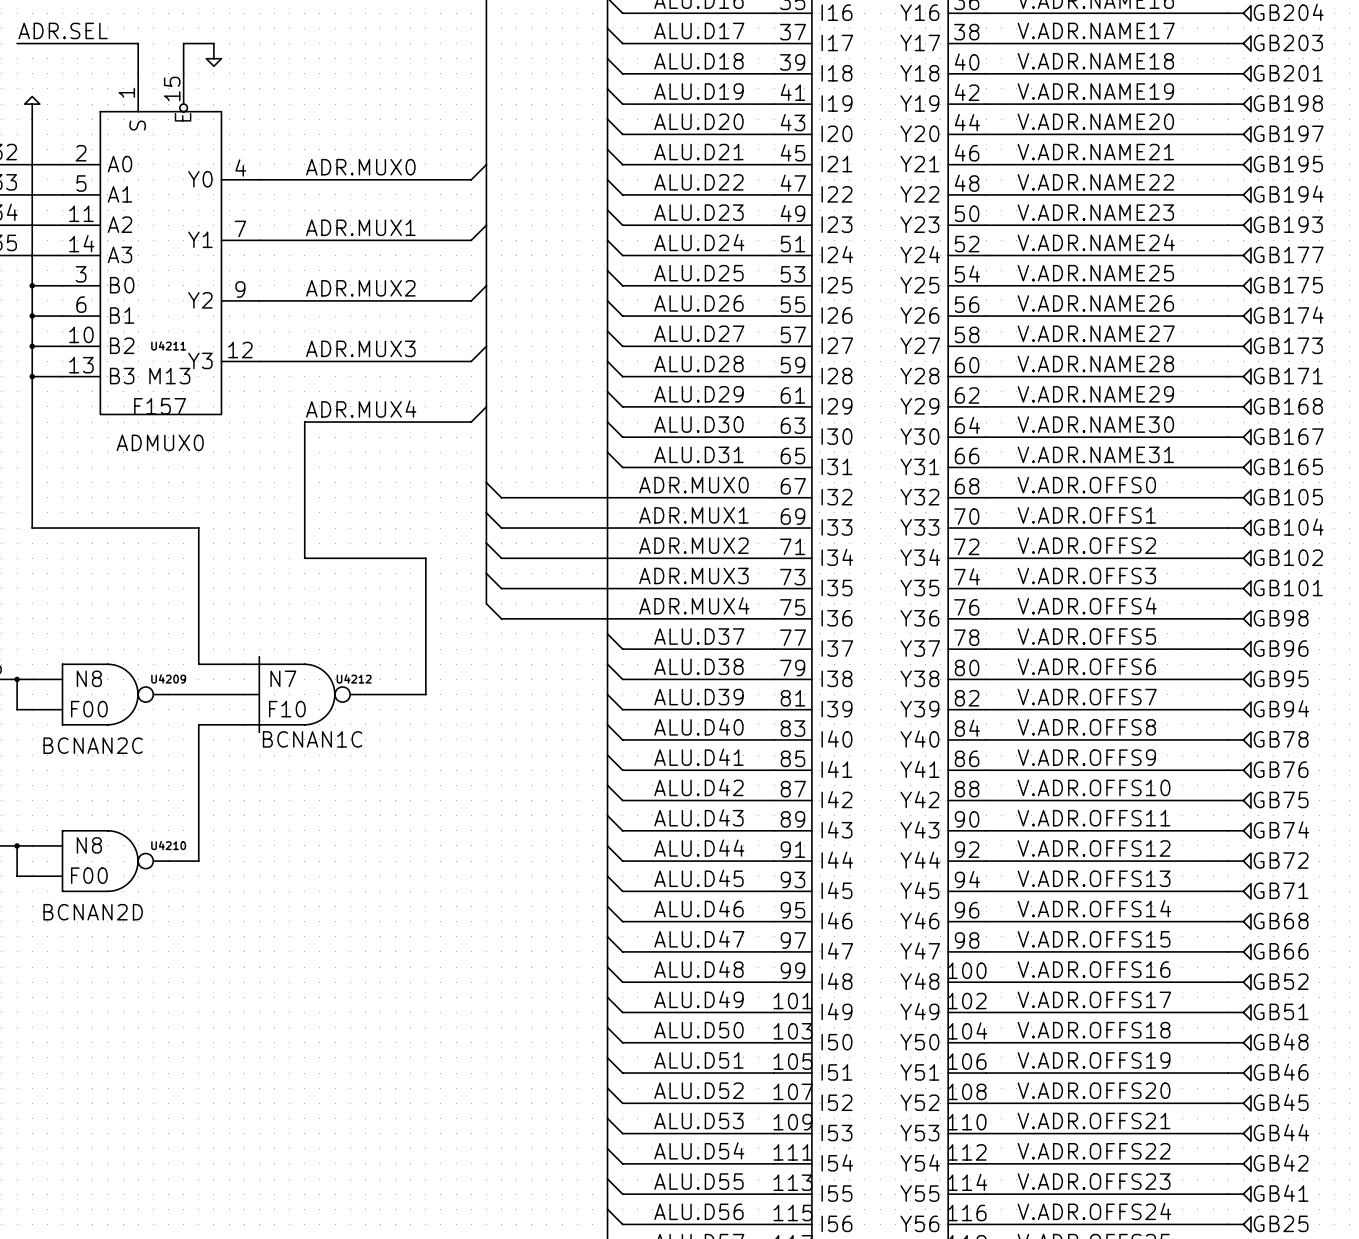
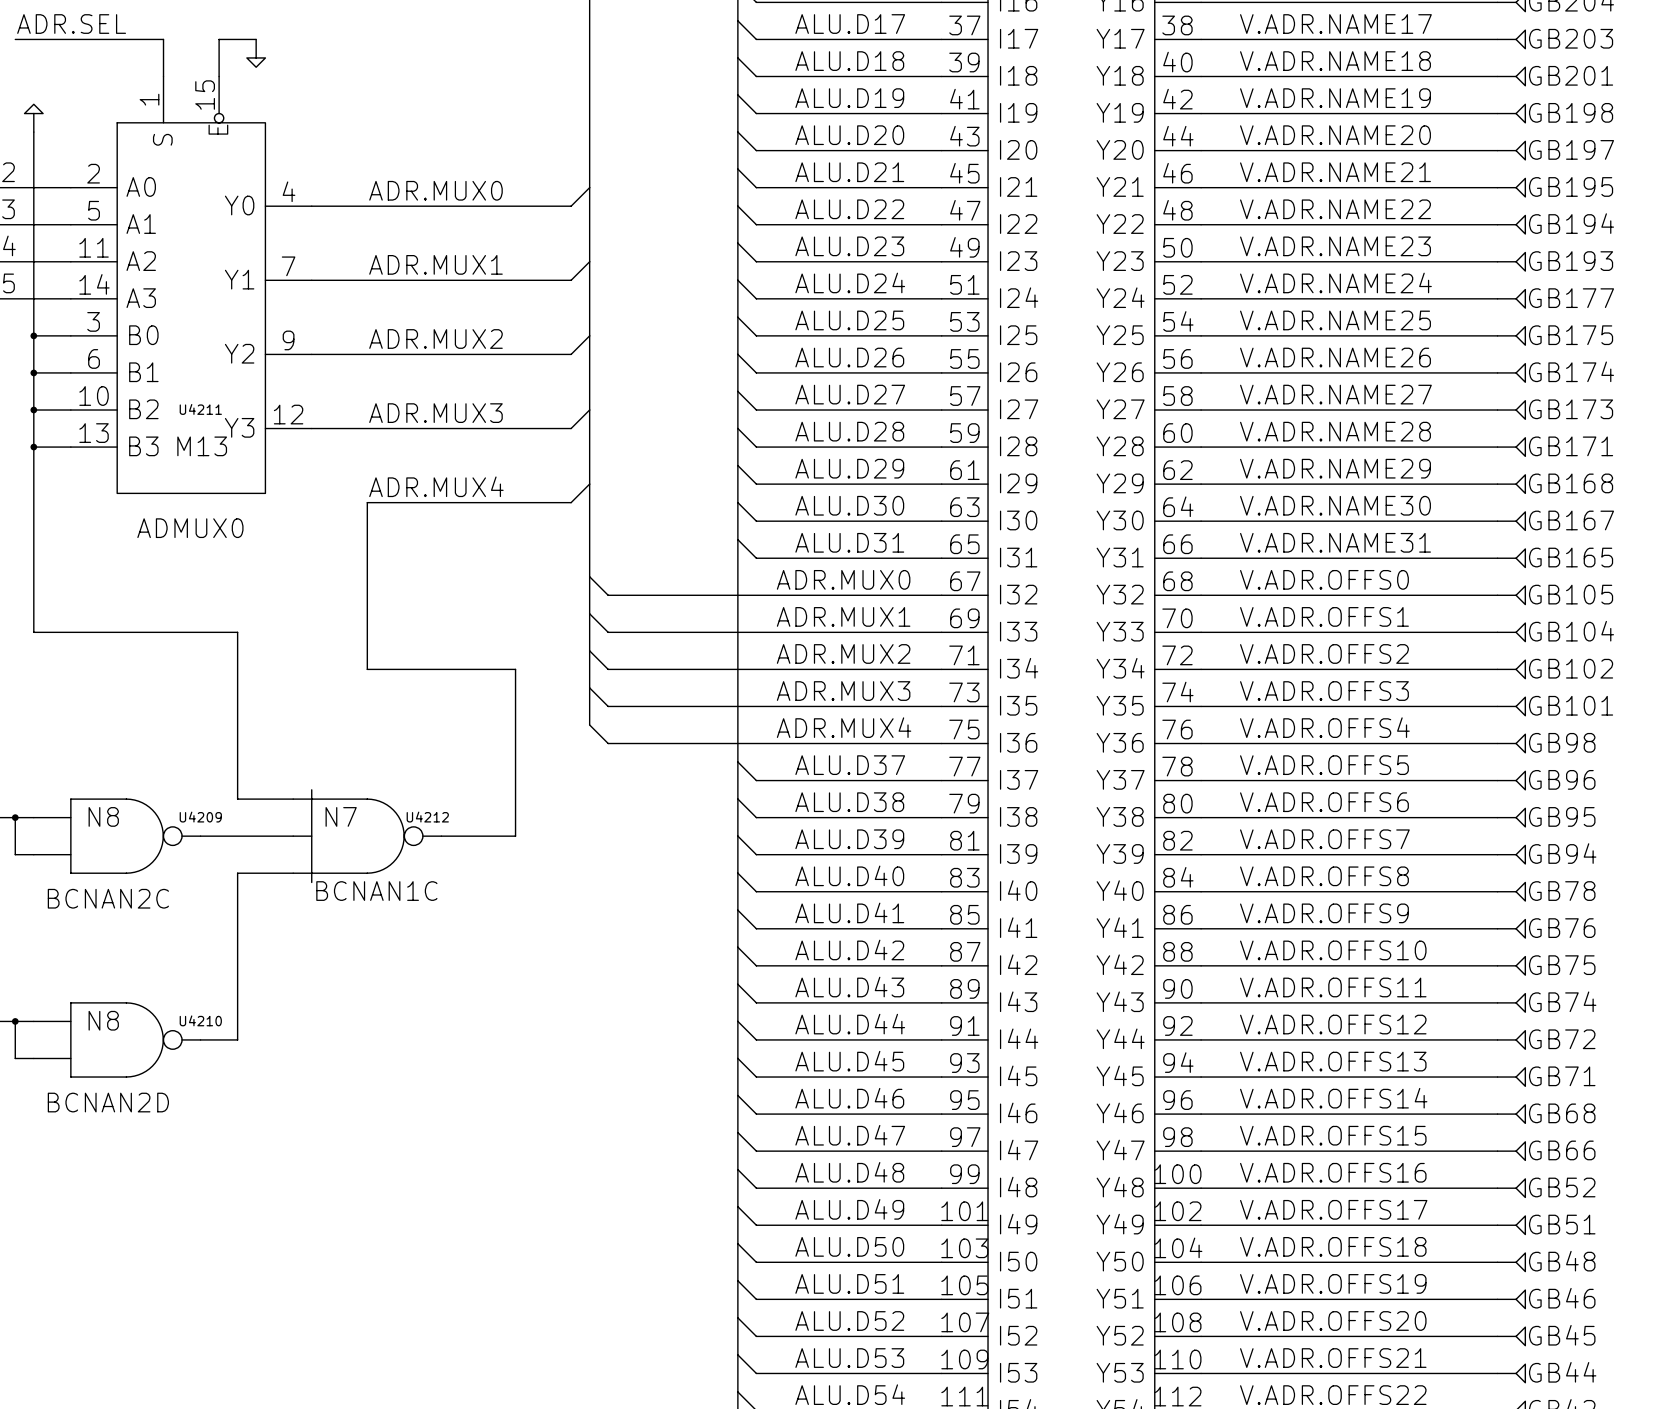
U4211 value: F157 (160, 406) -> none
U4209 value: F00 (89, 709) -> none
U4212 value: F10 (287, 709) -> none
U4210 value: F00 (89, 875) -> none

